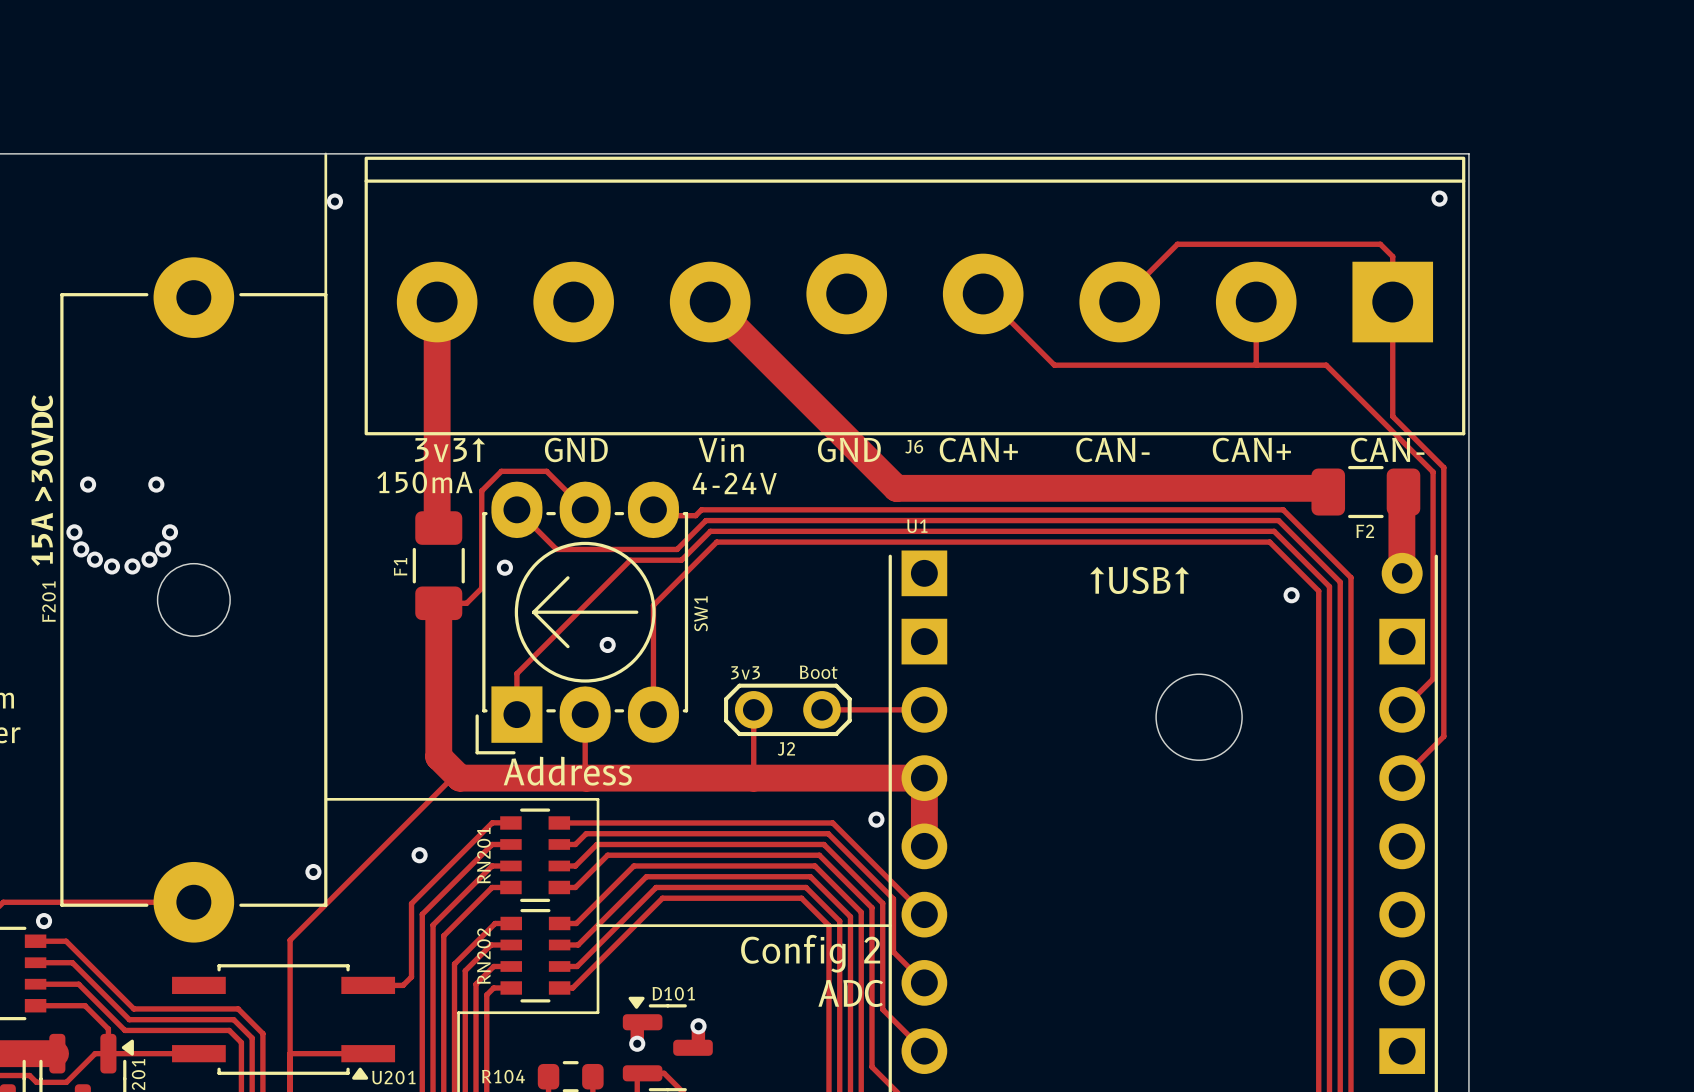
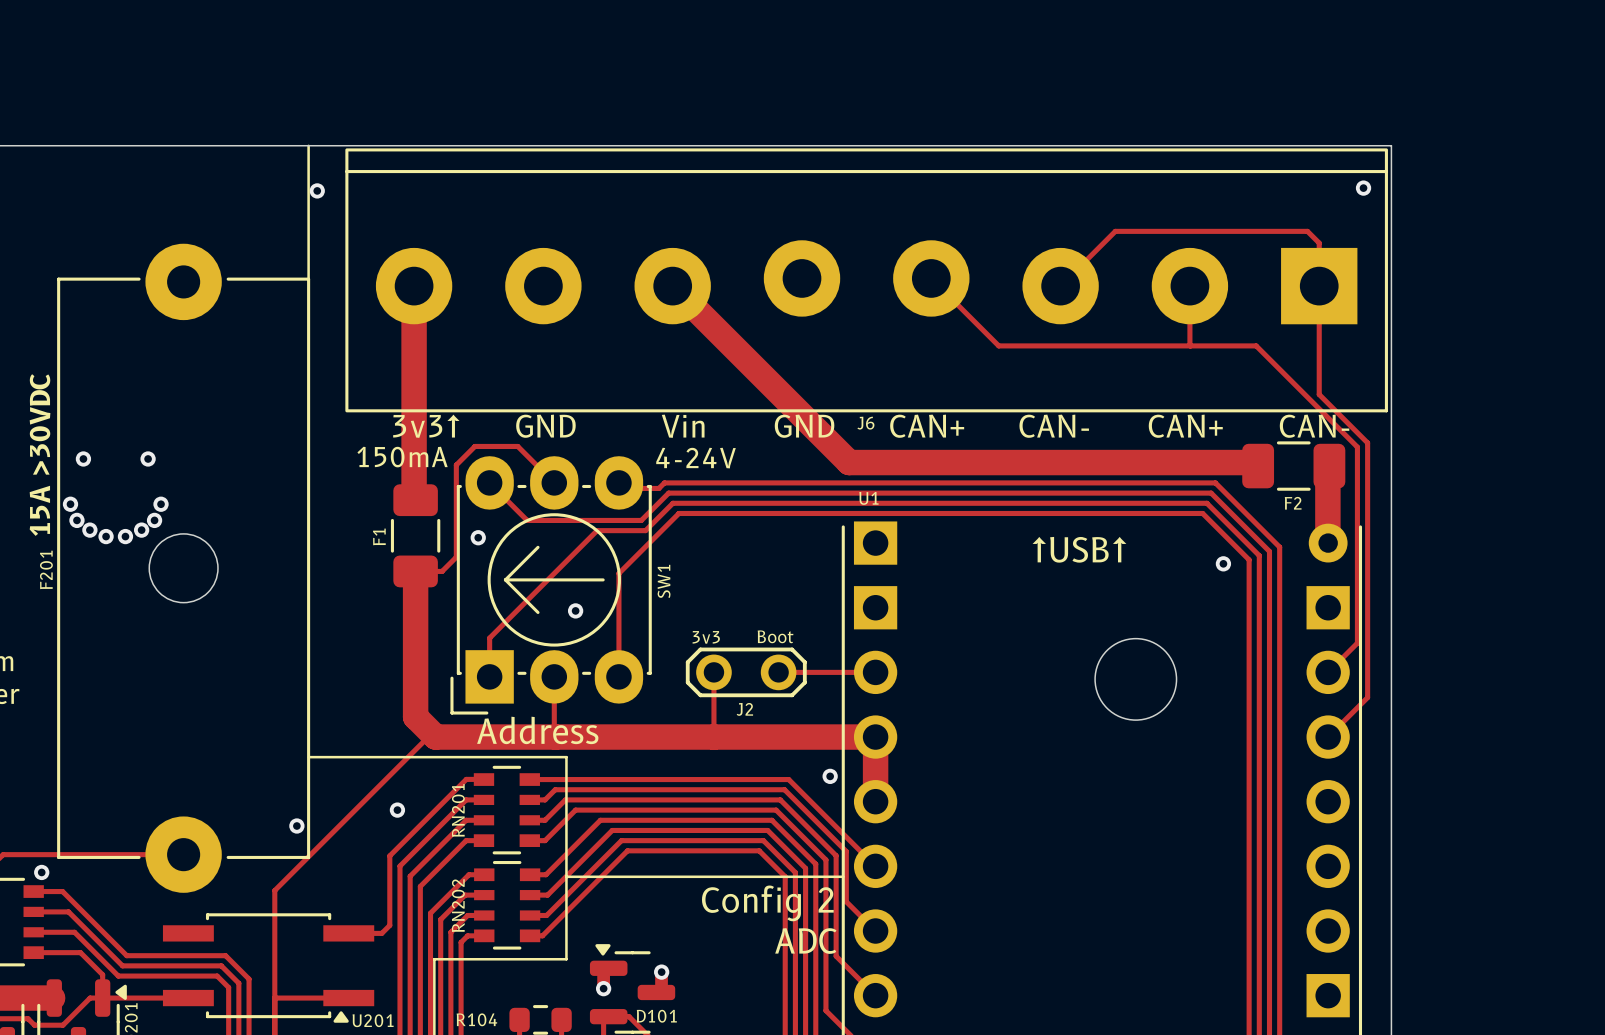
D101 name position: D101 (673, 993) -> D101 (656, 1016)

